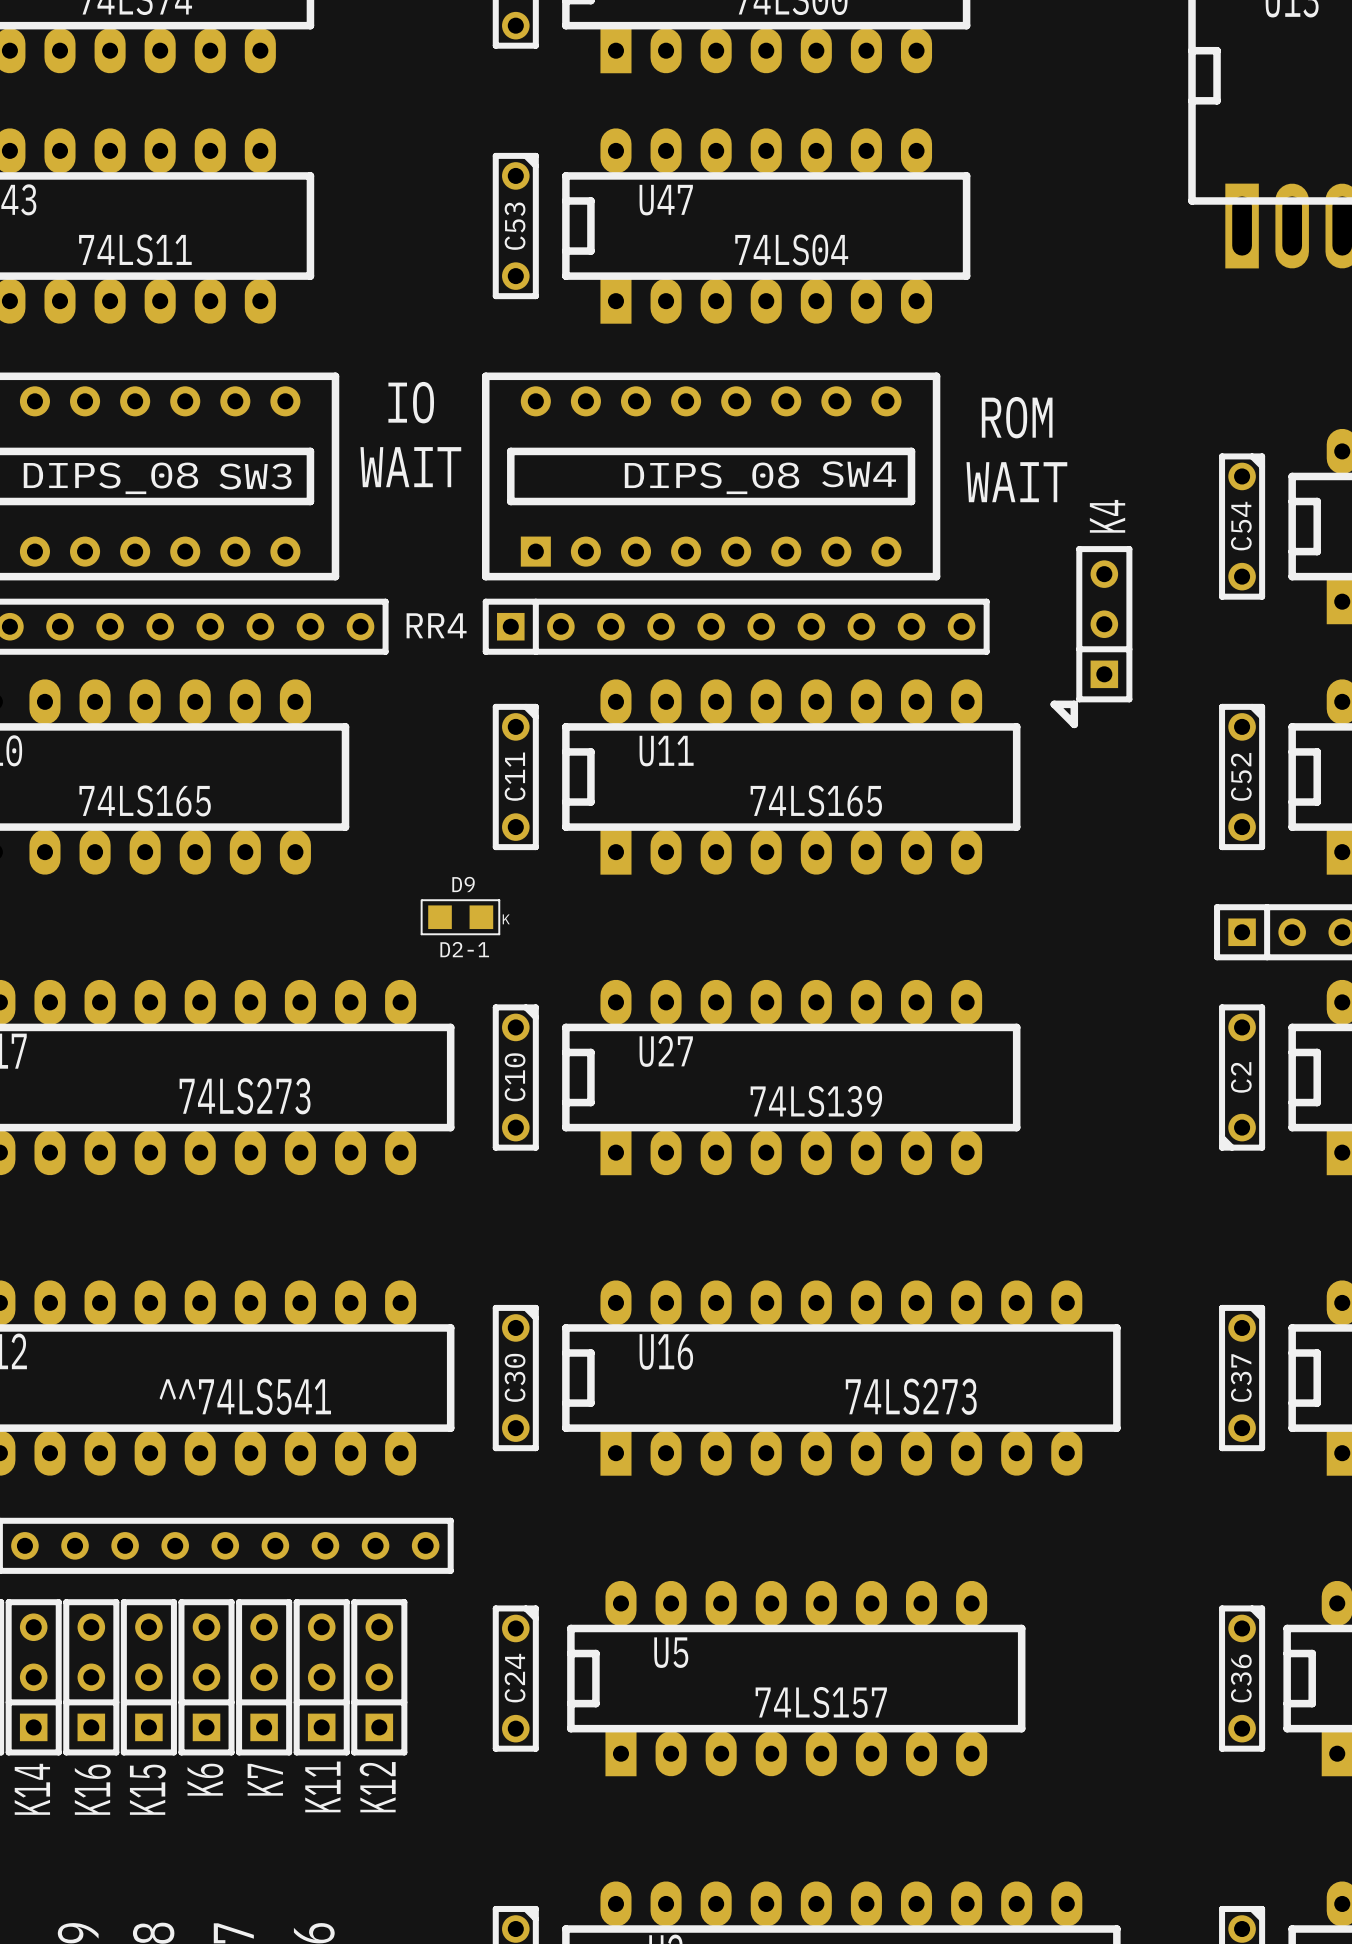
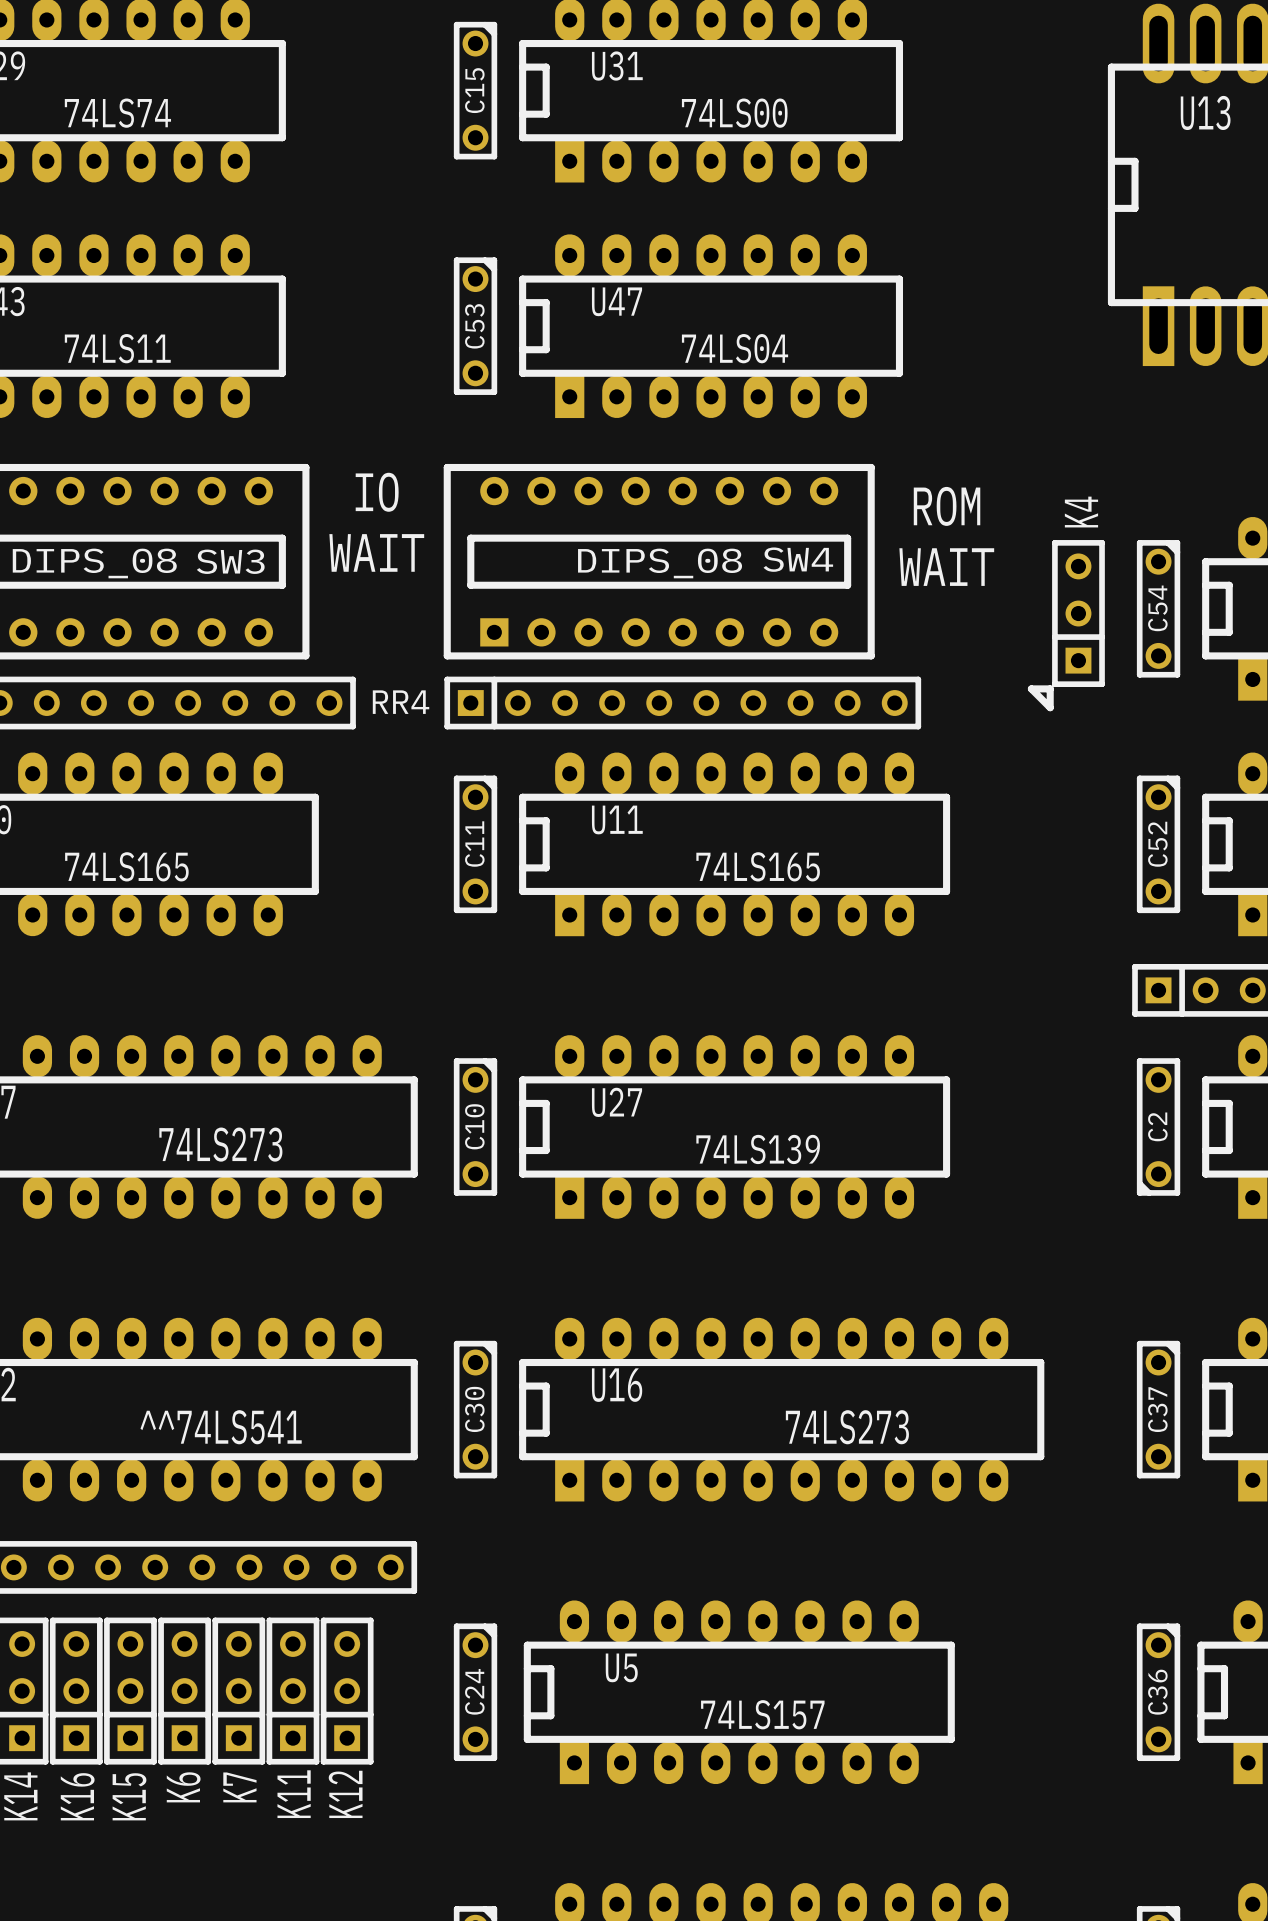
K4 position: (1104, 624) -> (1078, 613)
line: (1054, 704) (1074, 724) (1074, 704) (1054, 704) -> (1031, 688) (1050, 707) (1050, 688) (1031, 688)
D9: D2-1 (460, 917) -> none

